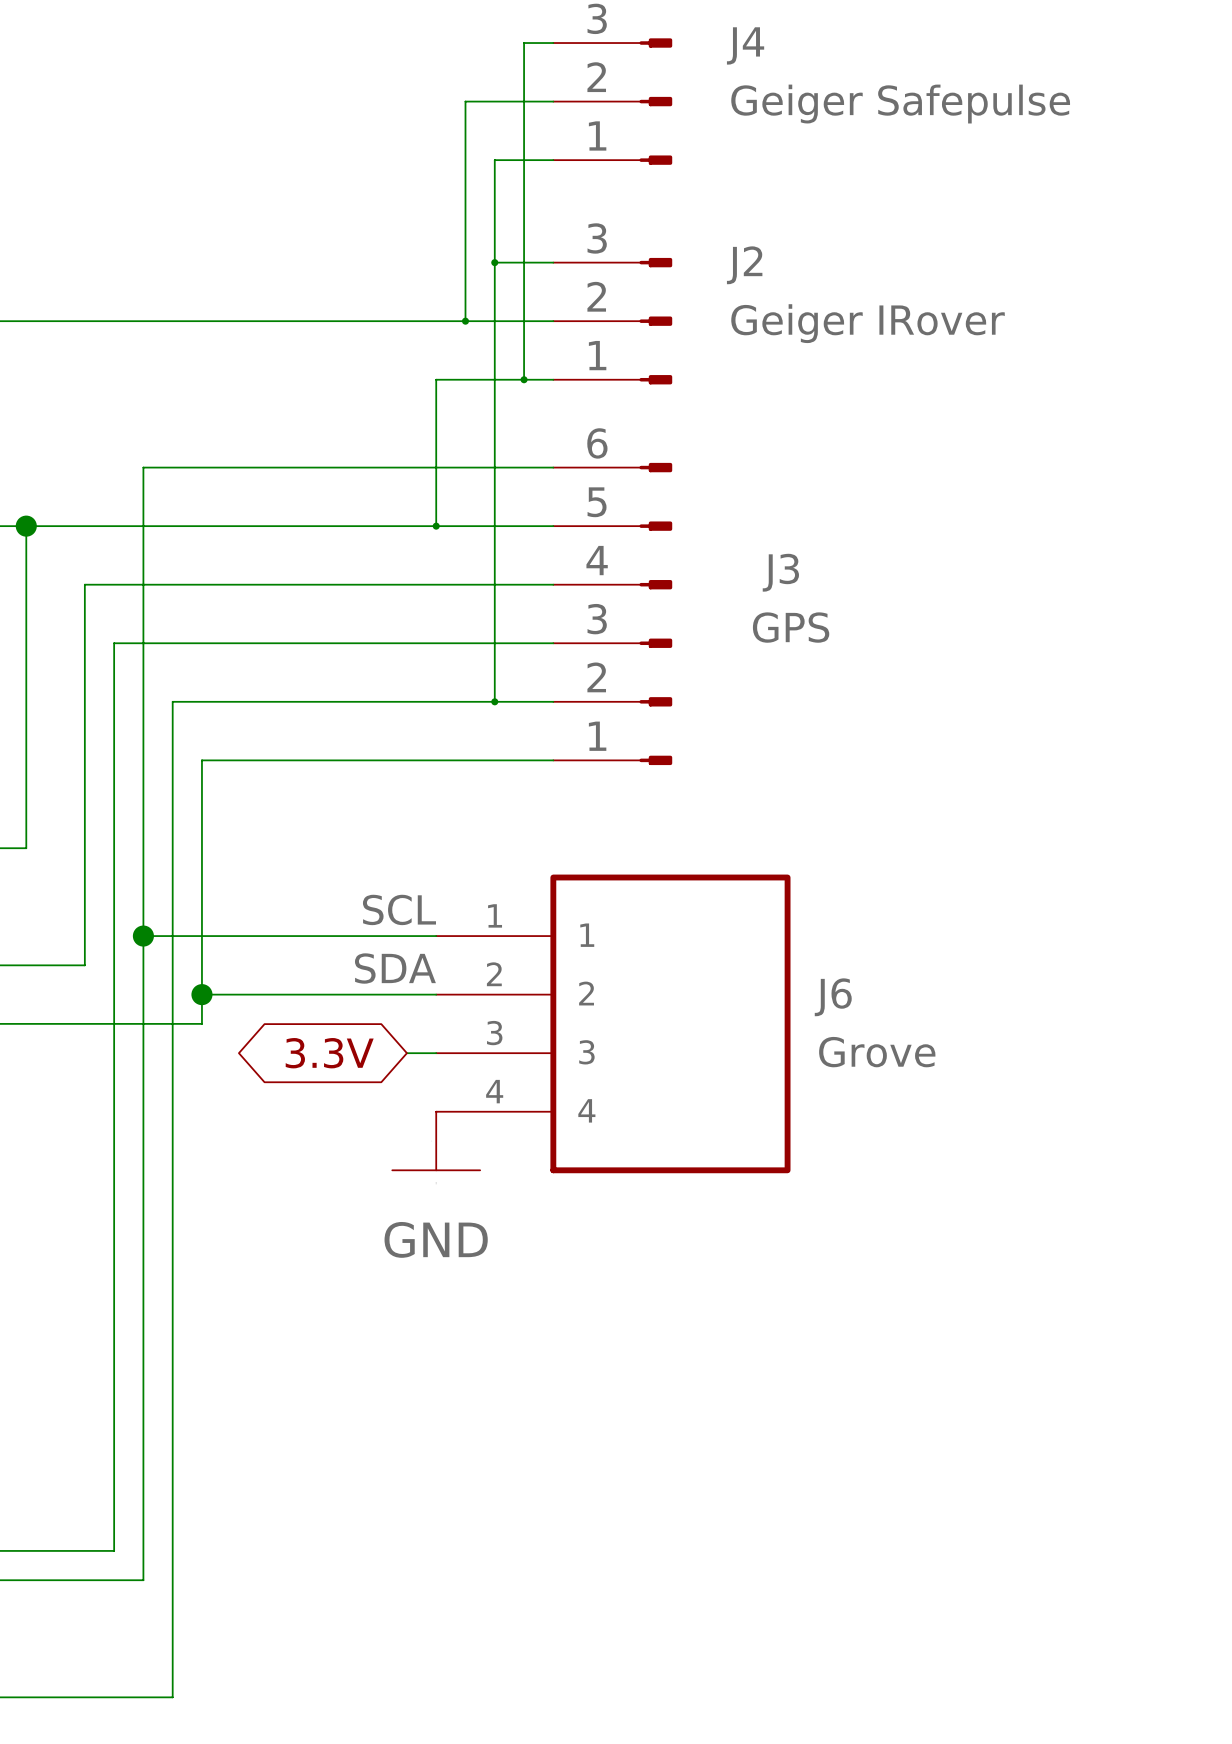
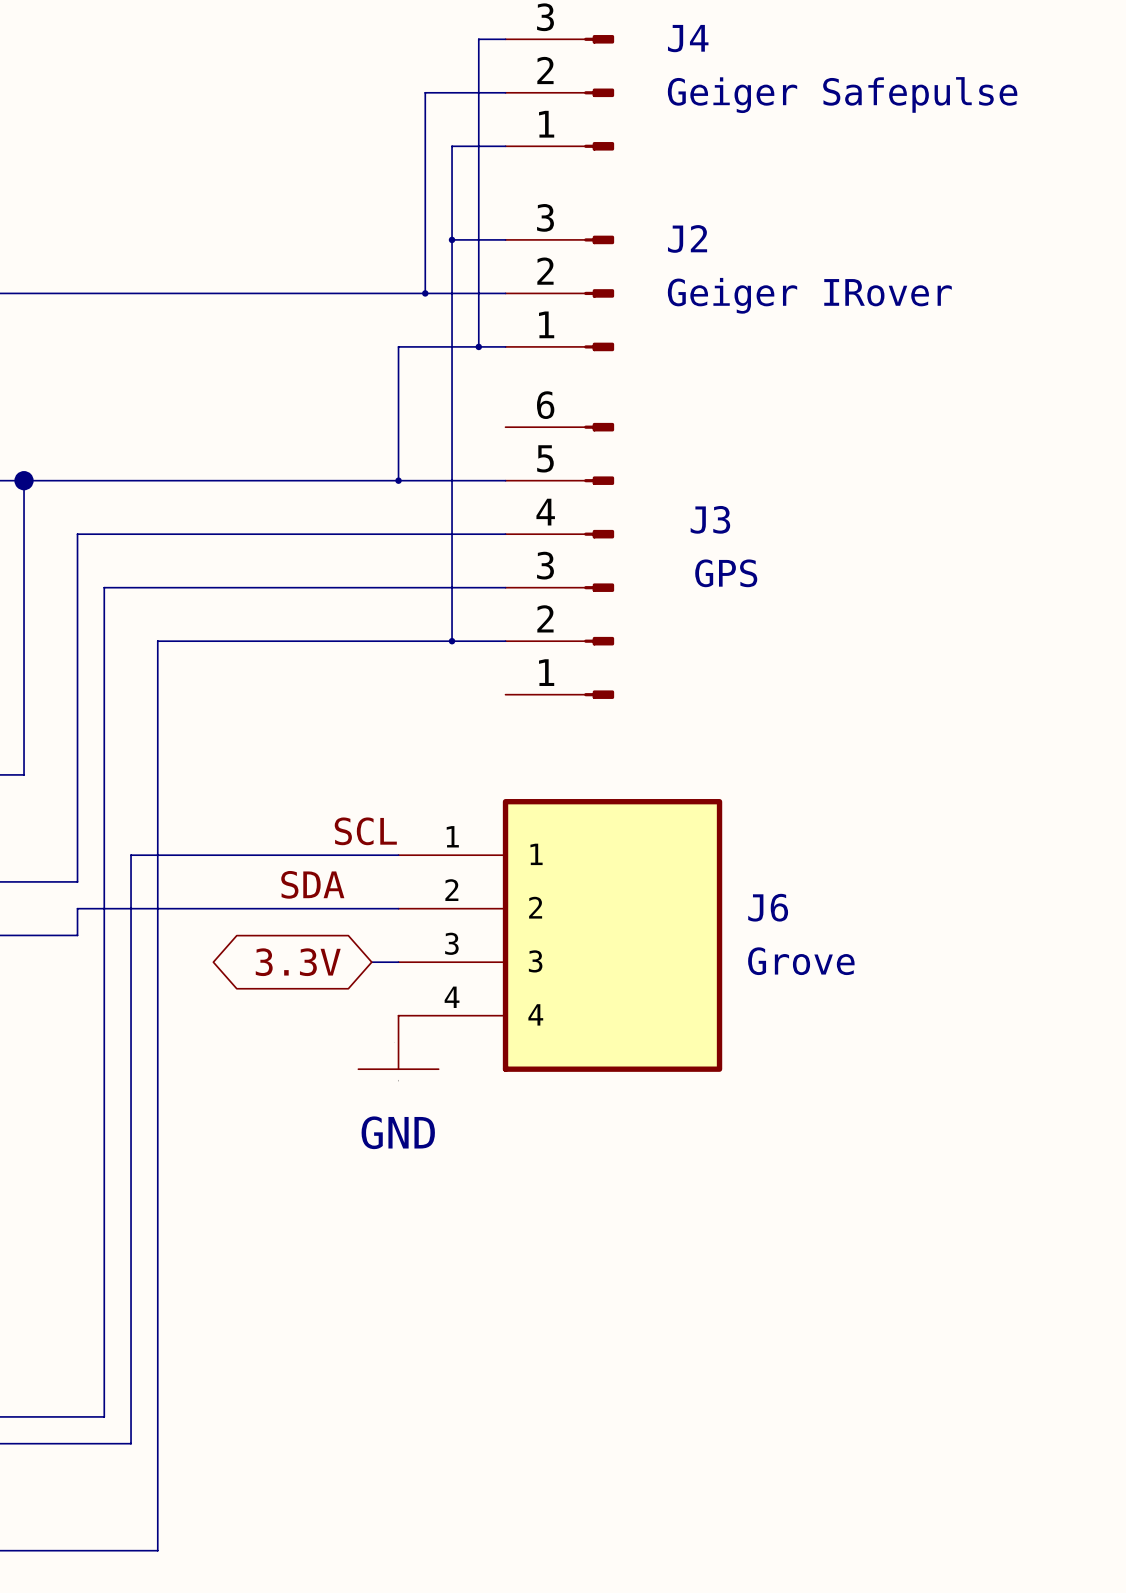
wire: (553, 467) (143, 467) (143, 936) -> none
wire: (553, 760) (201, 760) (201, 1023) (84, 1023) -> (184, 908) (77, 908) (77, 935)
junction: (143, 936) -> none
label position: SDA (395, 968) -> SDA (312, 884)
junction: (201, 994) -> none

